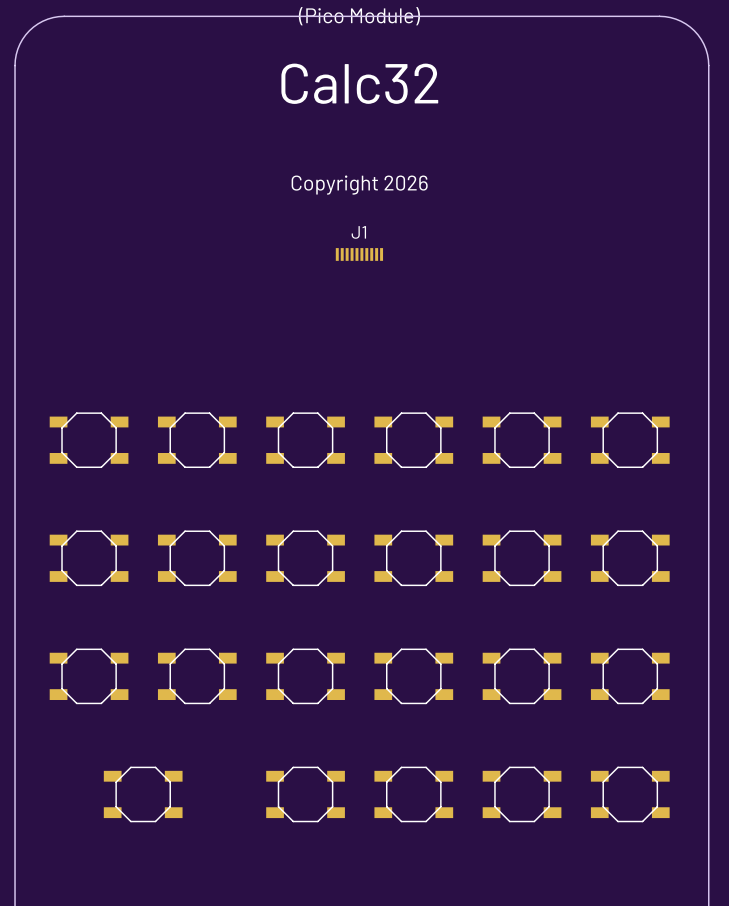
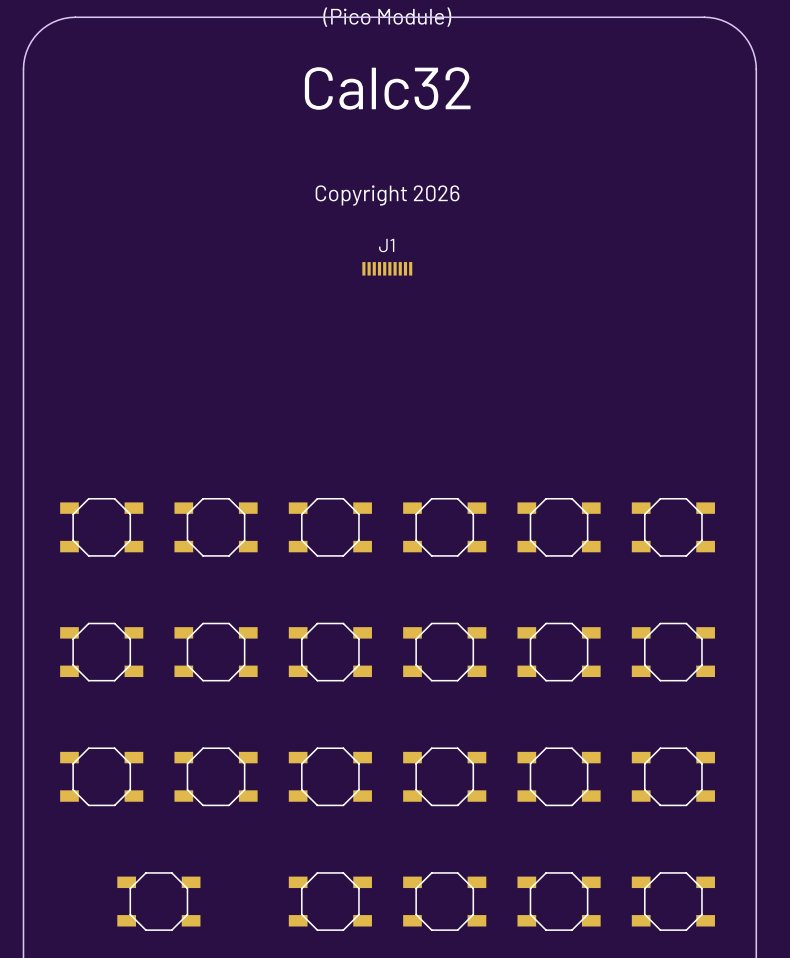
part: (89, 440) -> none
part: (197, 440) -> none
part: (305, 440) -> none
part: (413, 440) -> none
part: (522, 440) -> none
part: (630, 440) -> none
part: none -> (101, 527)
part: none -> (216, 527)
part: none -> (330, 527)
part: none -> (444, 527)
part: none -> (559, 527)
part: none -> (673, 527)
part: (89, 558) -> none
part: (197, 558) -> none
part: (305, 558) -> none
part: (413, 558) -> none
part: (522, 558) -> none
part: (630, 558) -> none
part: none -> (101, 652)
part: none -> (216, 652)
part: none -> (330, 652)
part: none -> (444, 652)
part: none -> (559, 652)
part: none -> (673, 652)
part: (89, 676) -> none
part: (197, 676) -> none
part: (305, 676) -> none
part: (413, 676) -> none
part: (522, 676) -> none
part: (630, 676) -> none
part: none -> (101, 776)
part: none -> (216, 776)
part: none -> (330, 776)
part: none -> (444, 776)
part: none -> (559, 776)
part: none -> (673, 776)
part: (143, 794) -> none
part: (305, 794) -> none
part: (413, 794) -> none
part: (522, 794) -> none
part: (630, 794) -> none
part: none -> (158, 901)
part: none -> (330, 901)
part: none -> (444, 901)
part: none -> (559, 901)
part: none -> (673, 901)

